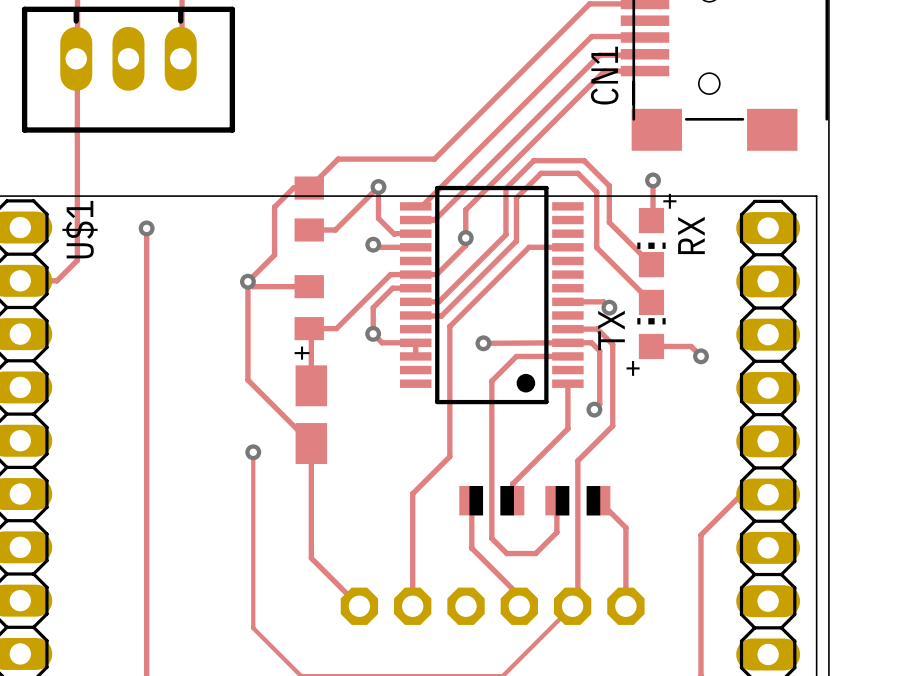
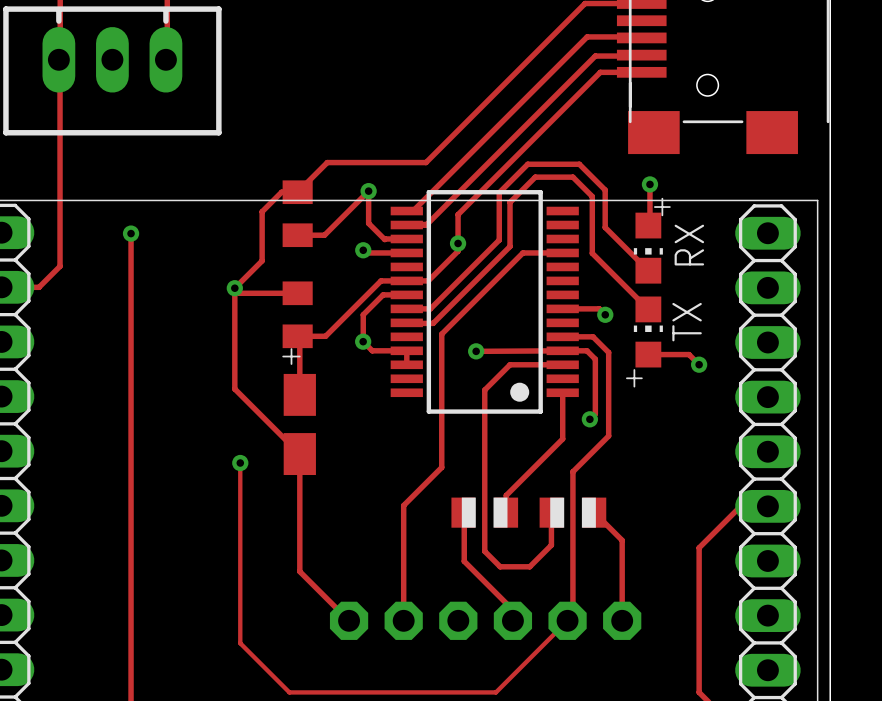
CN1 name: CN1 (604, 75) -> none
U$1 name: U$1 (80, 229) -> none
TX name position: TX (611, 330) -> TX (687, 322)

